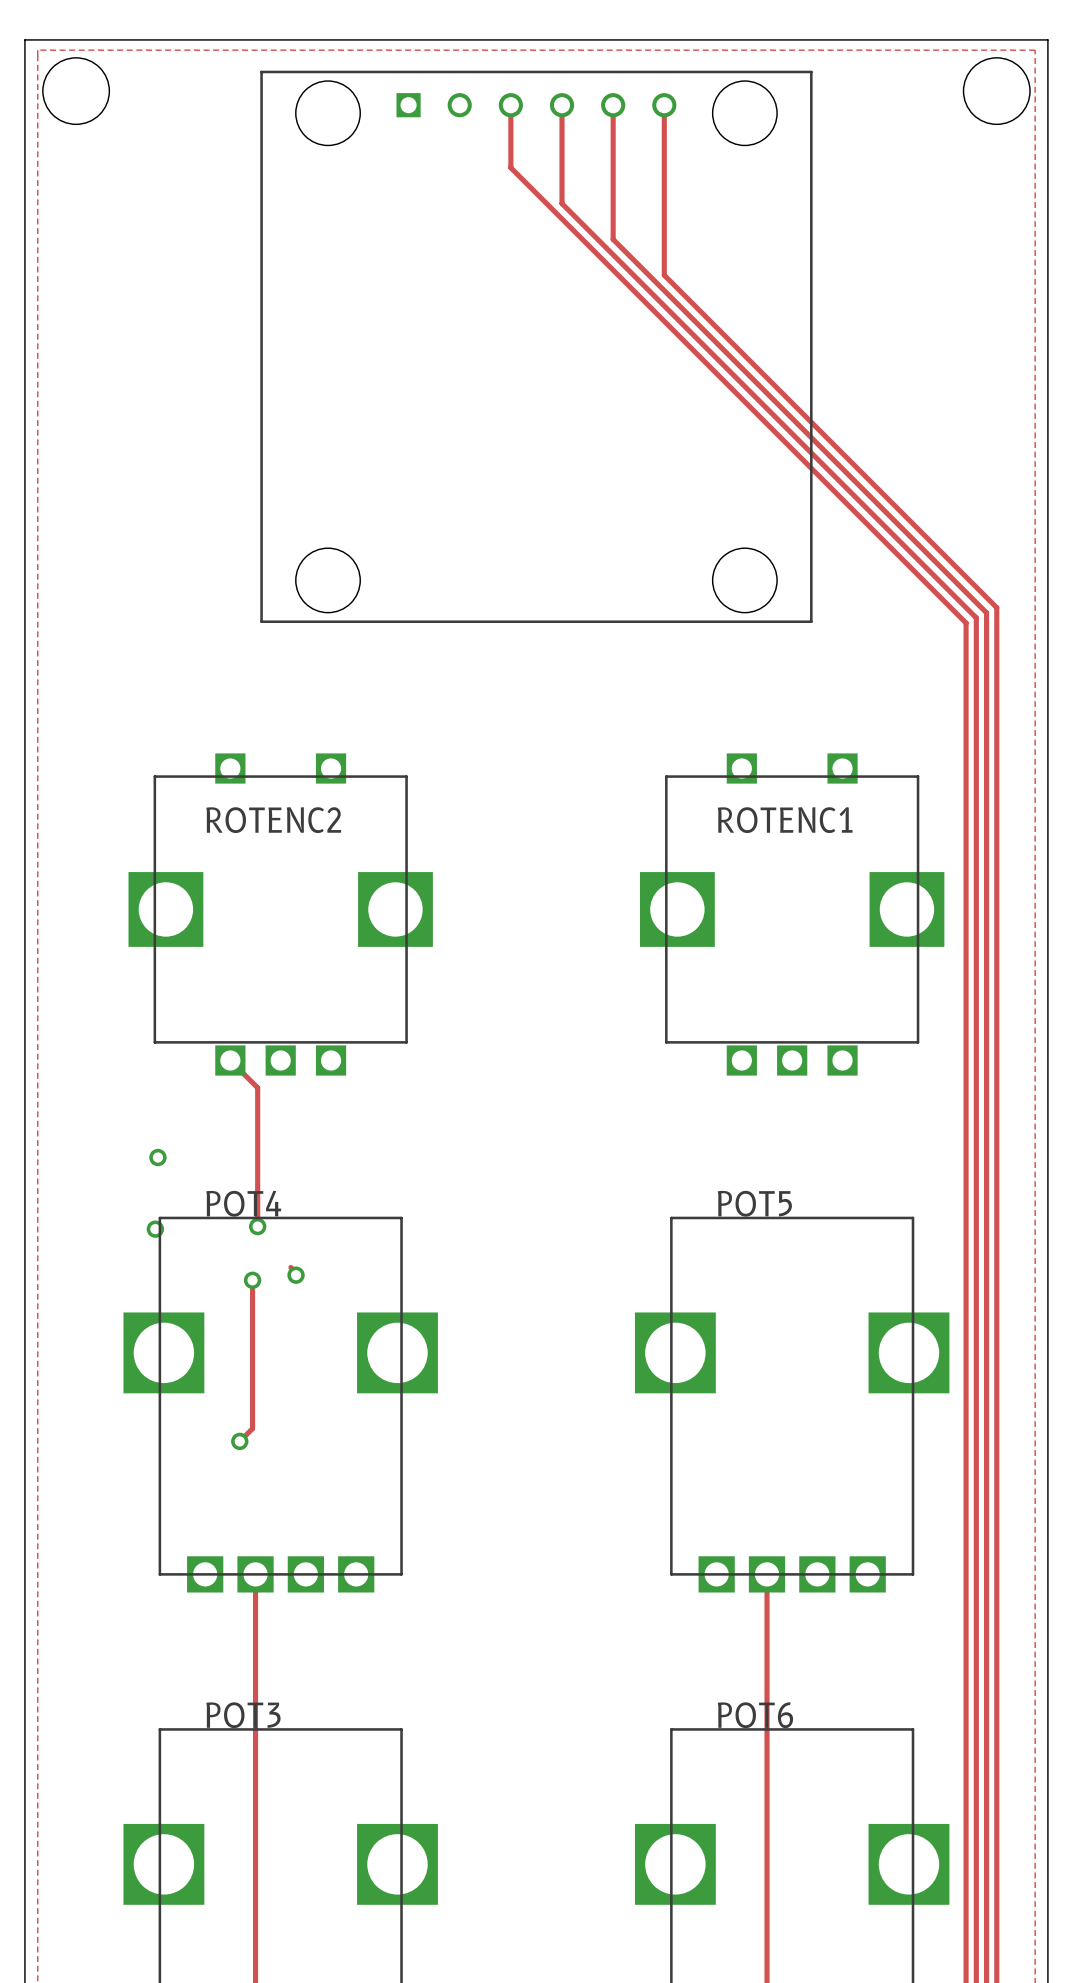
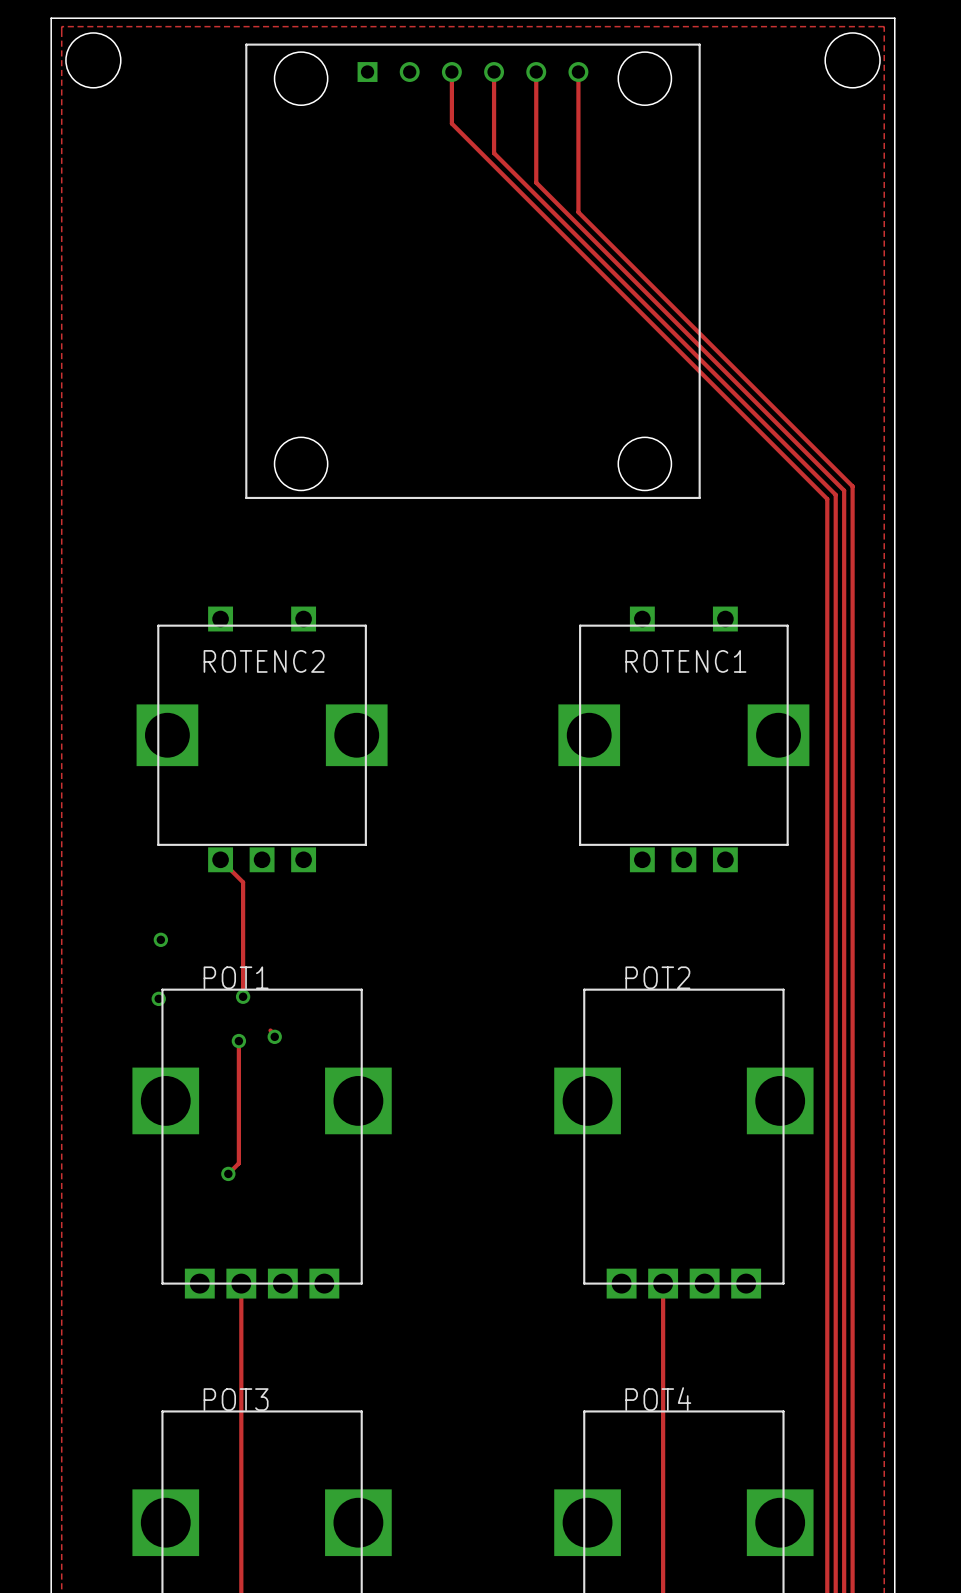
POT4 name: POT4 (243, 1203) -> POT1 (236, 977)
POT5 name: POT5 (754, 1203) -> POT2 (657, 977)
POT6 name: POT6 (755, 1715) -> POT4 (658, 1399)

